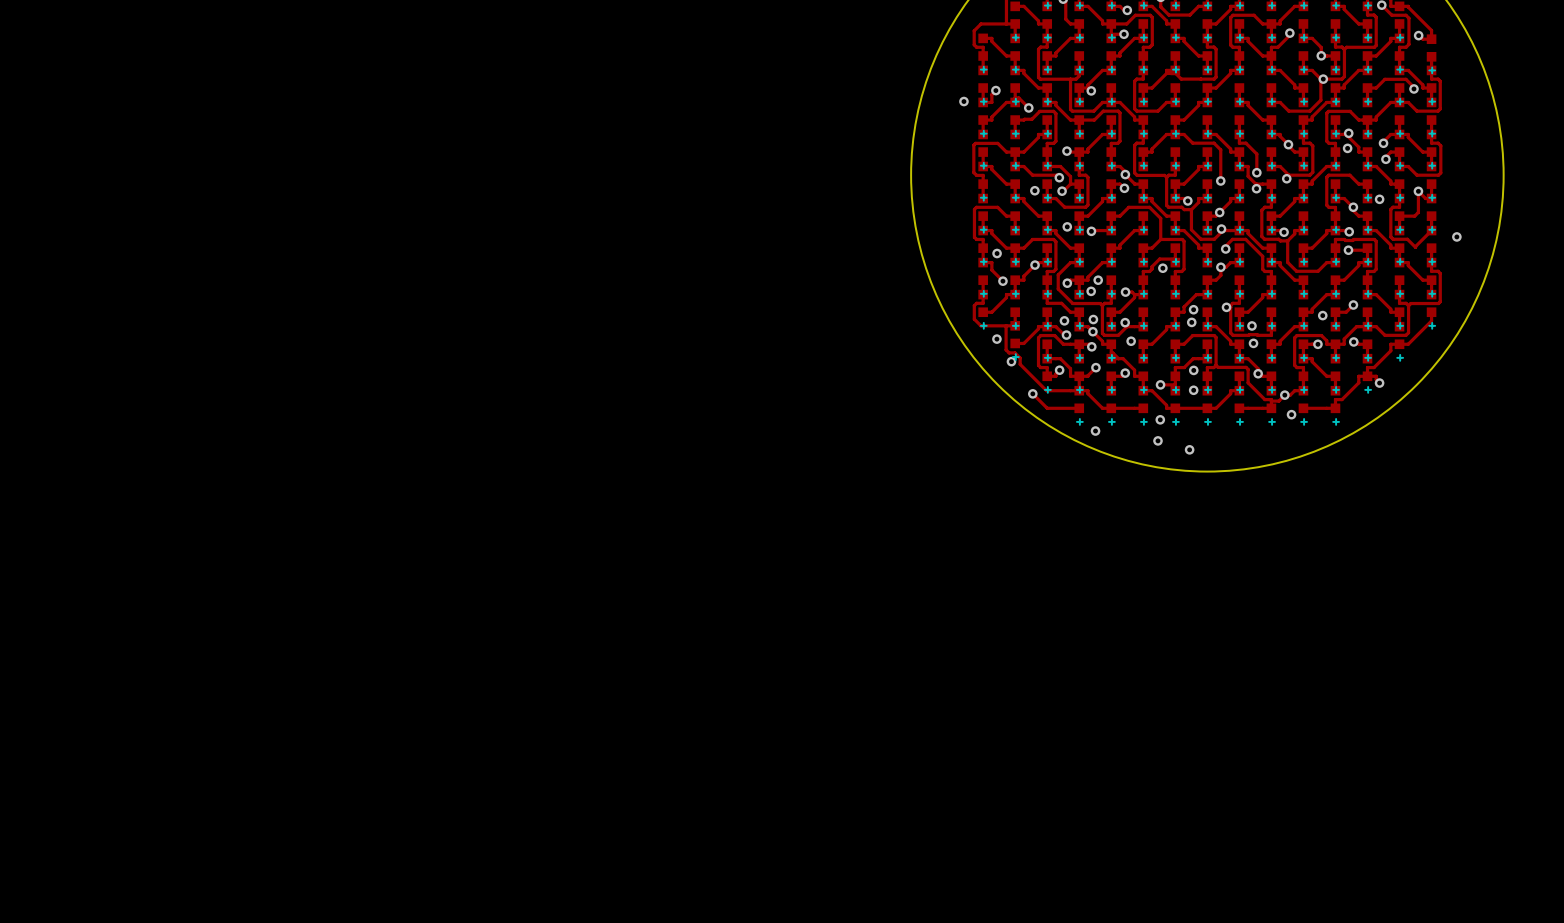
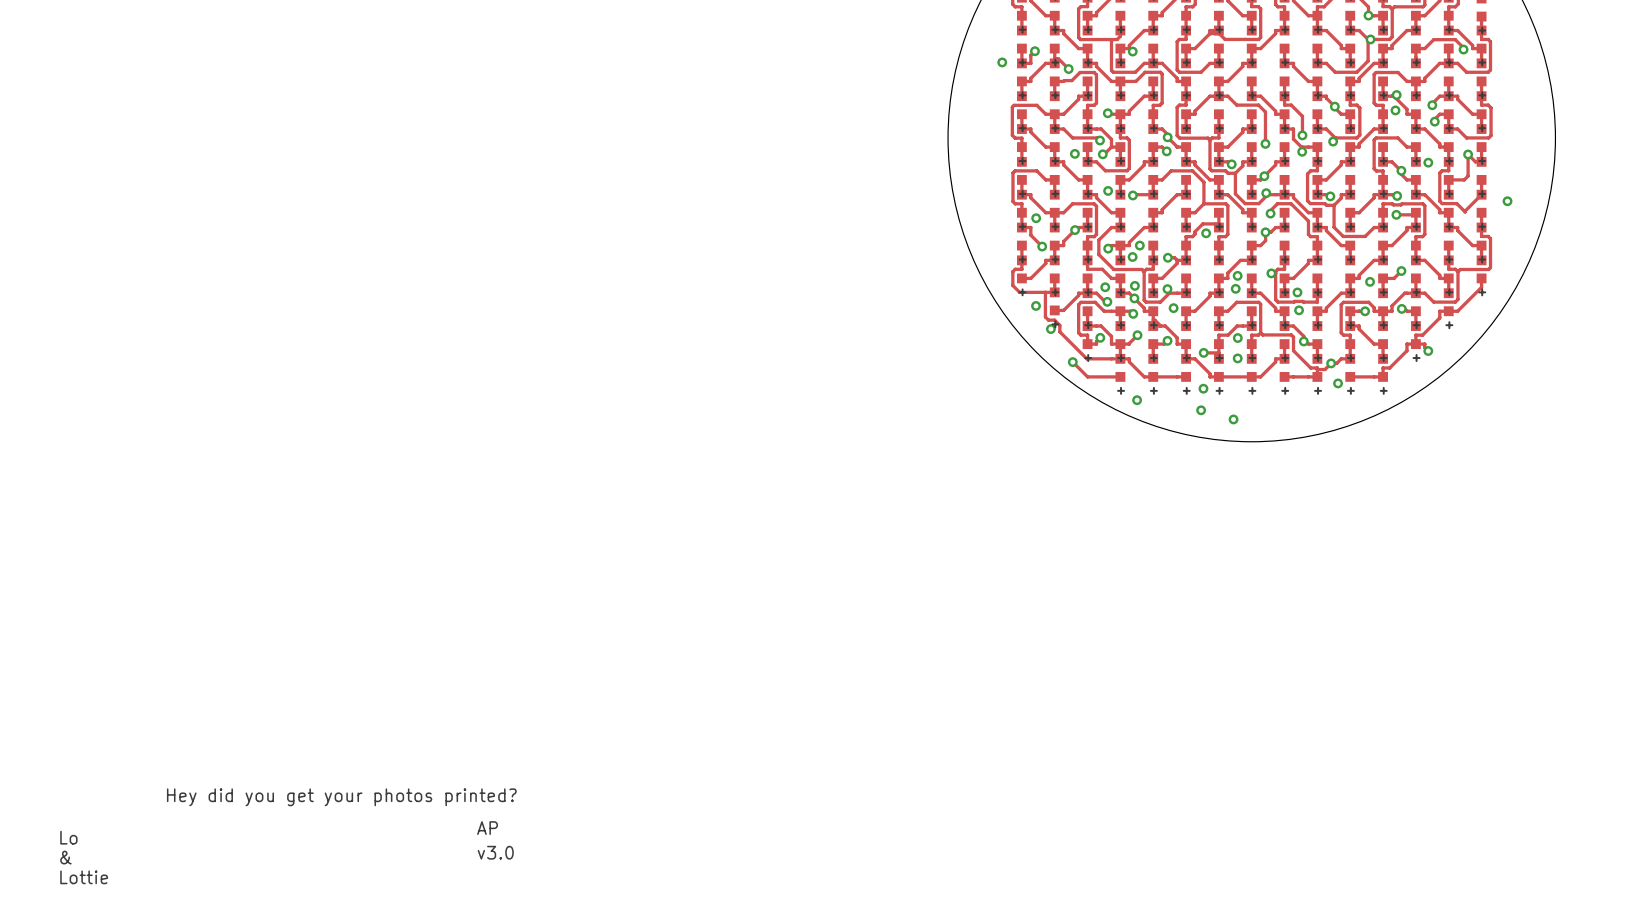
text: none -> Hey did you get your photos printed? (341, 797)
text: none -> AP (487, 828)
text: none -> Lo (68, 837)
text: none -> v3.0 (495, 852)
text: none -> & (65, 857)
text: none -> Lottie (84, 877)

